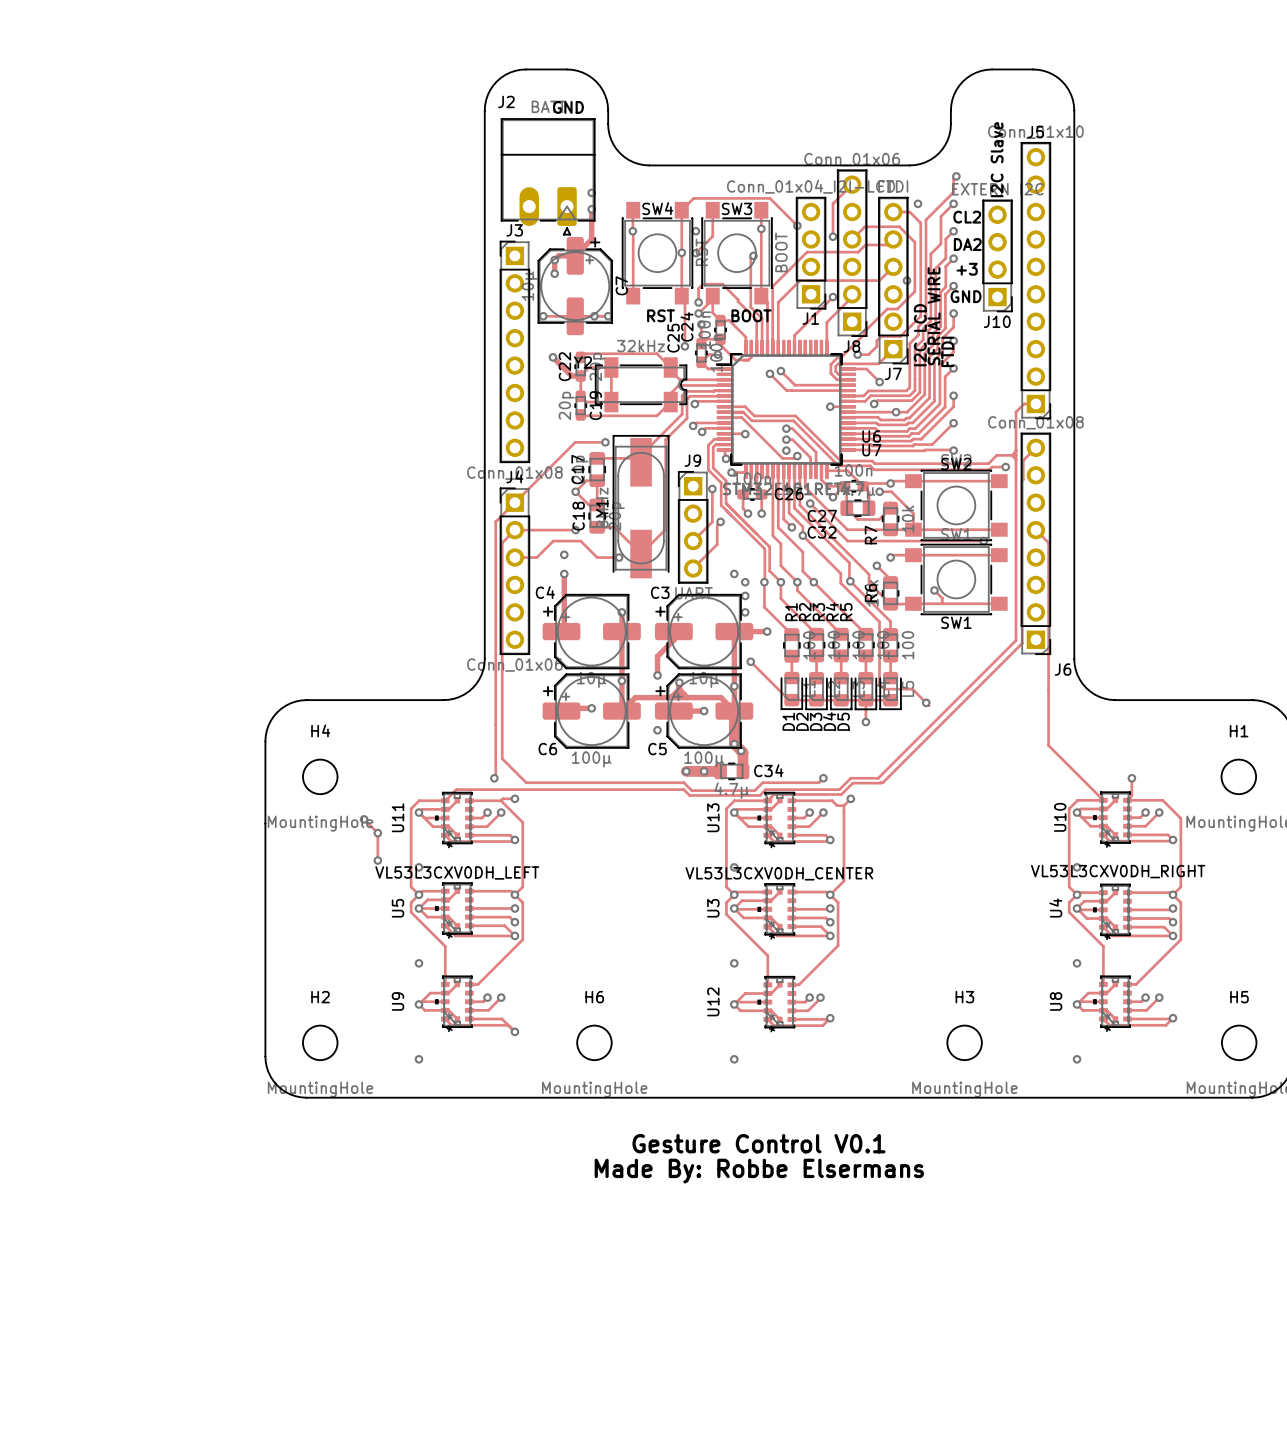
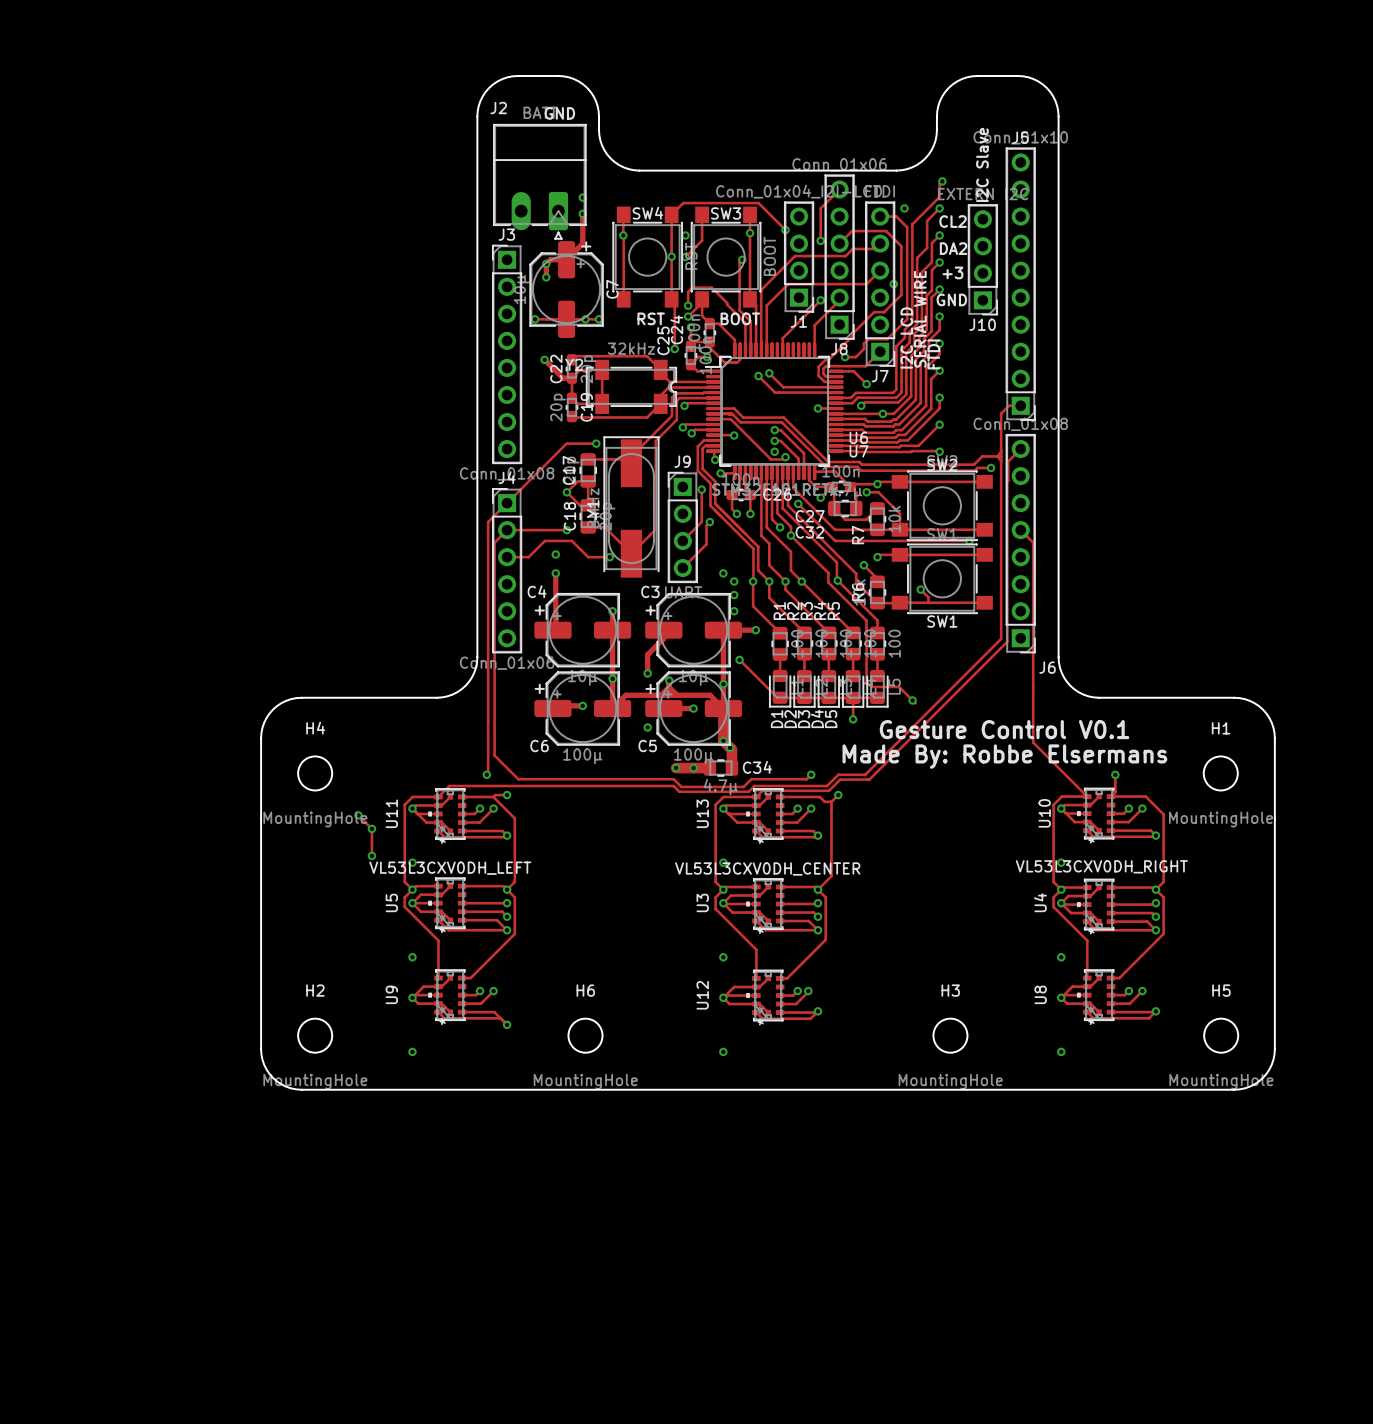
text: none -> Gesture Control V0.1 (1004, 729)
text: none -> Made By: Robbe Elsermans (1004, 756)
text: Gesture Control V0.1 (758, 1143) -> none
text: Made By: Robbe Elsermans (759, 1171) -> none

